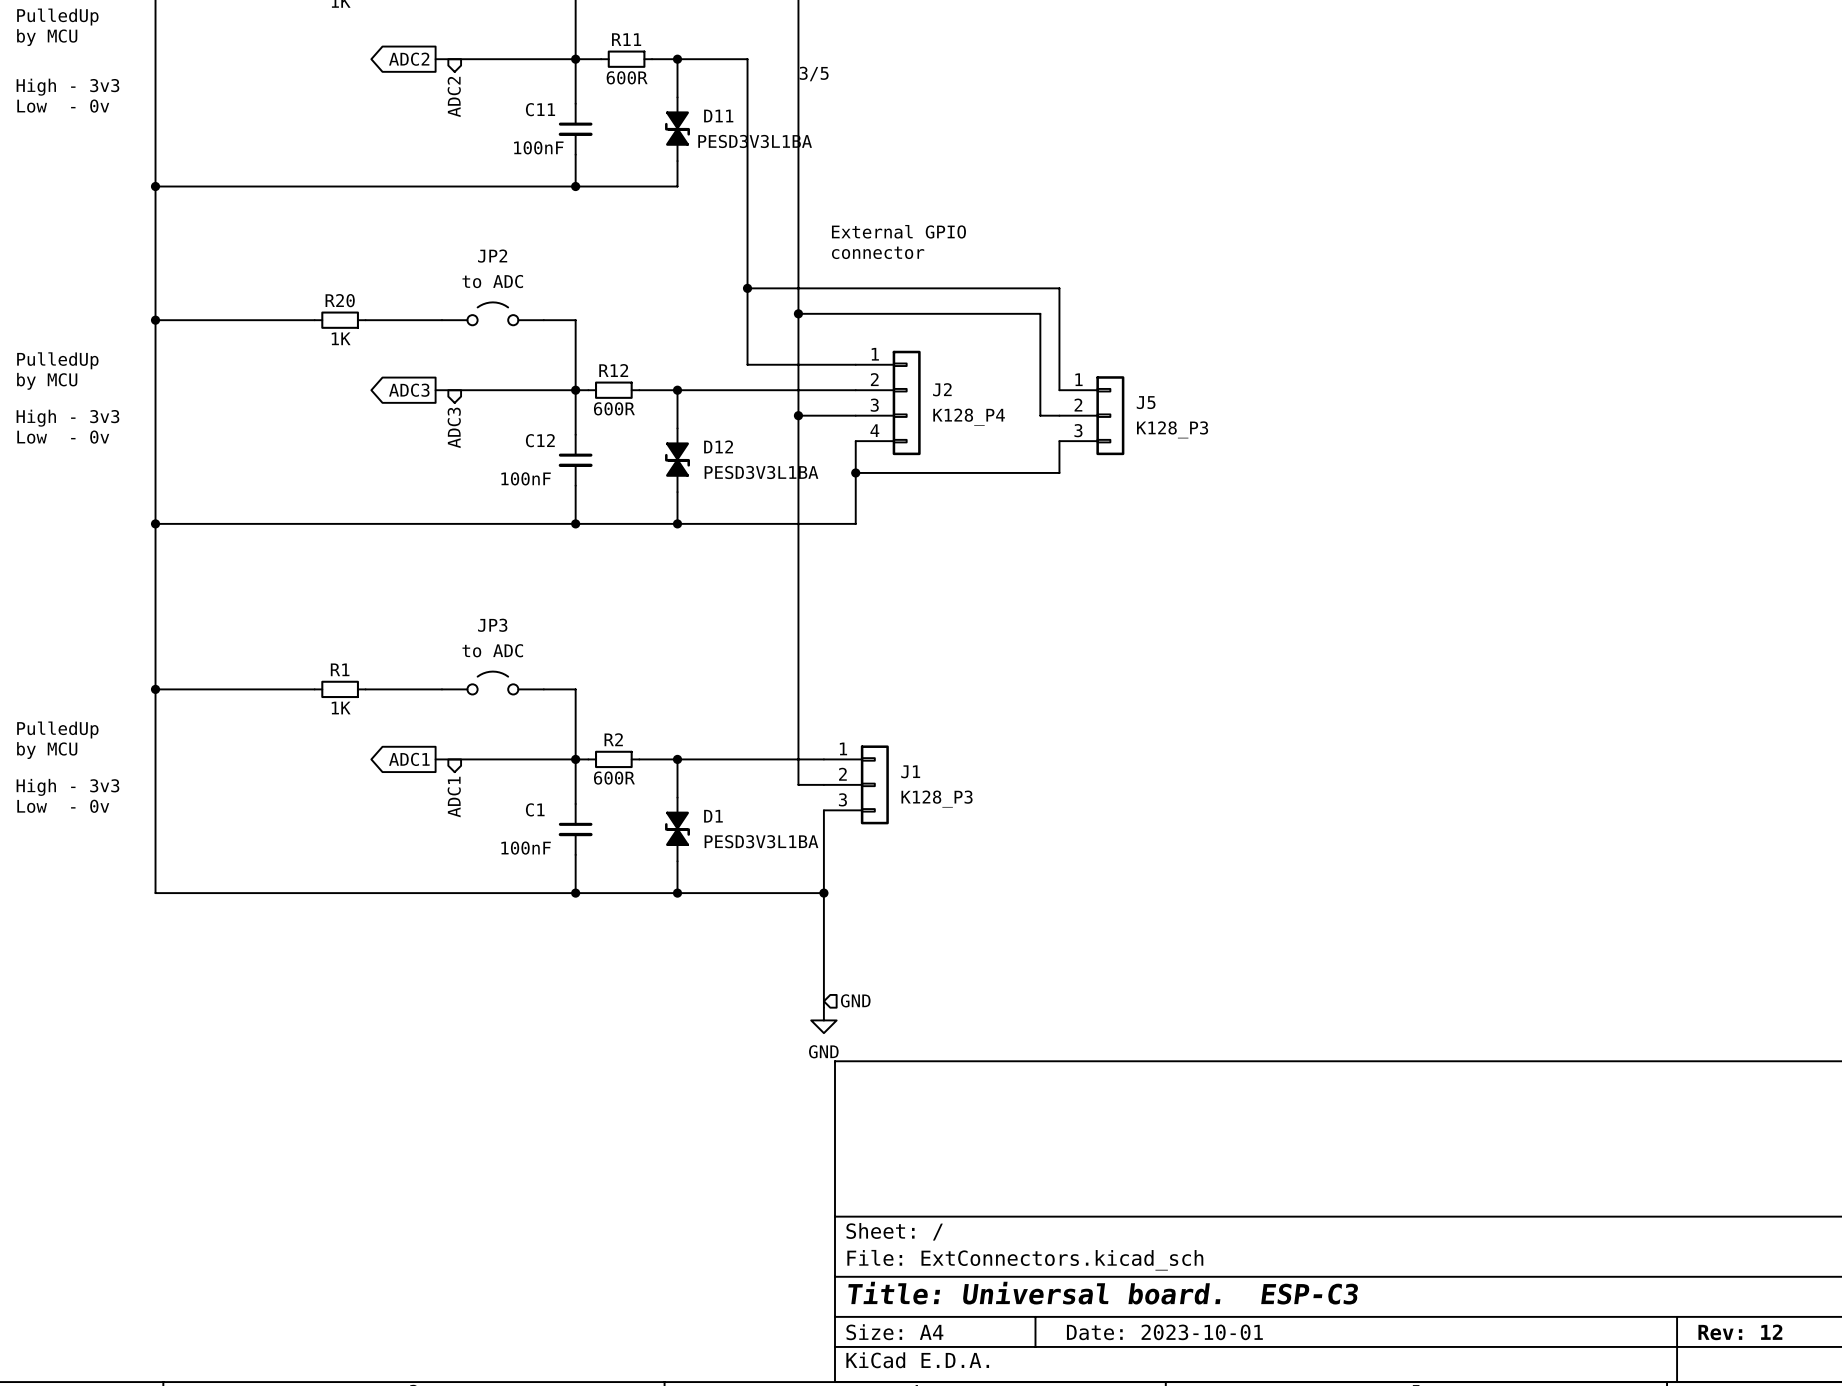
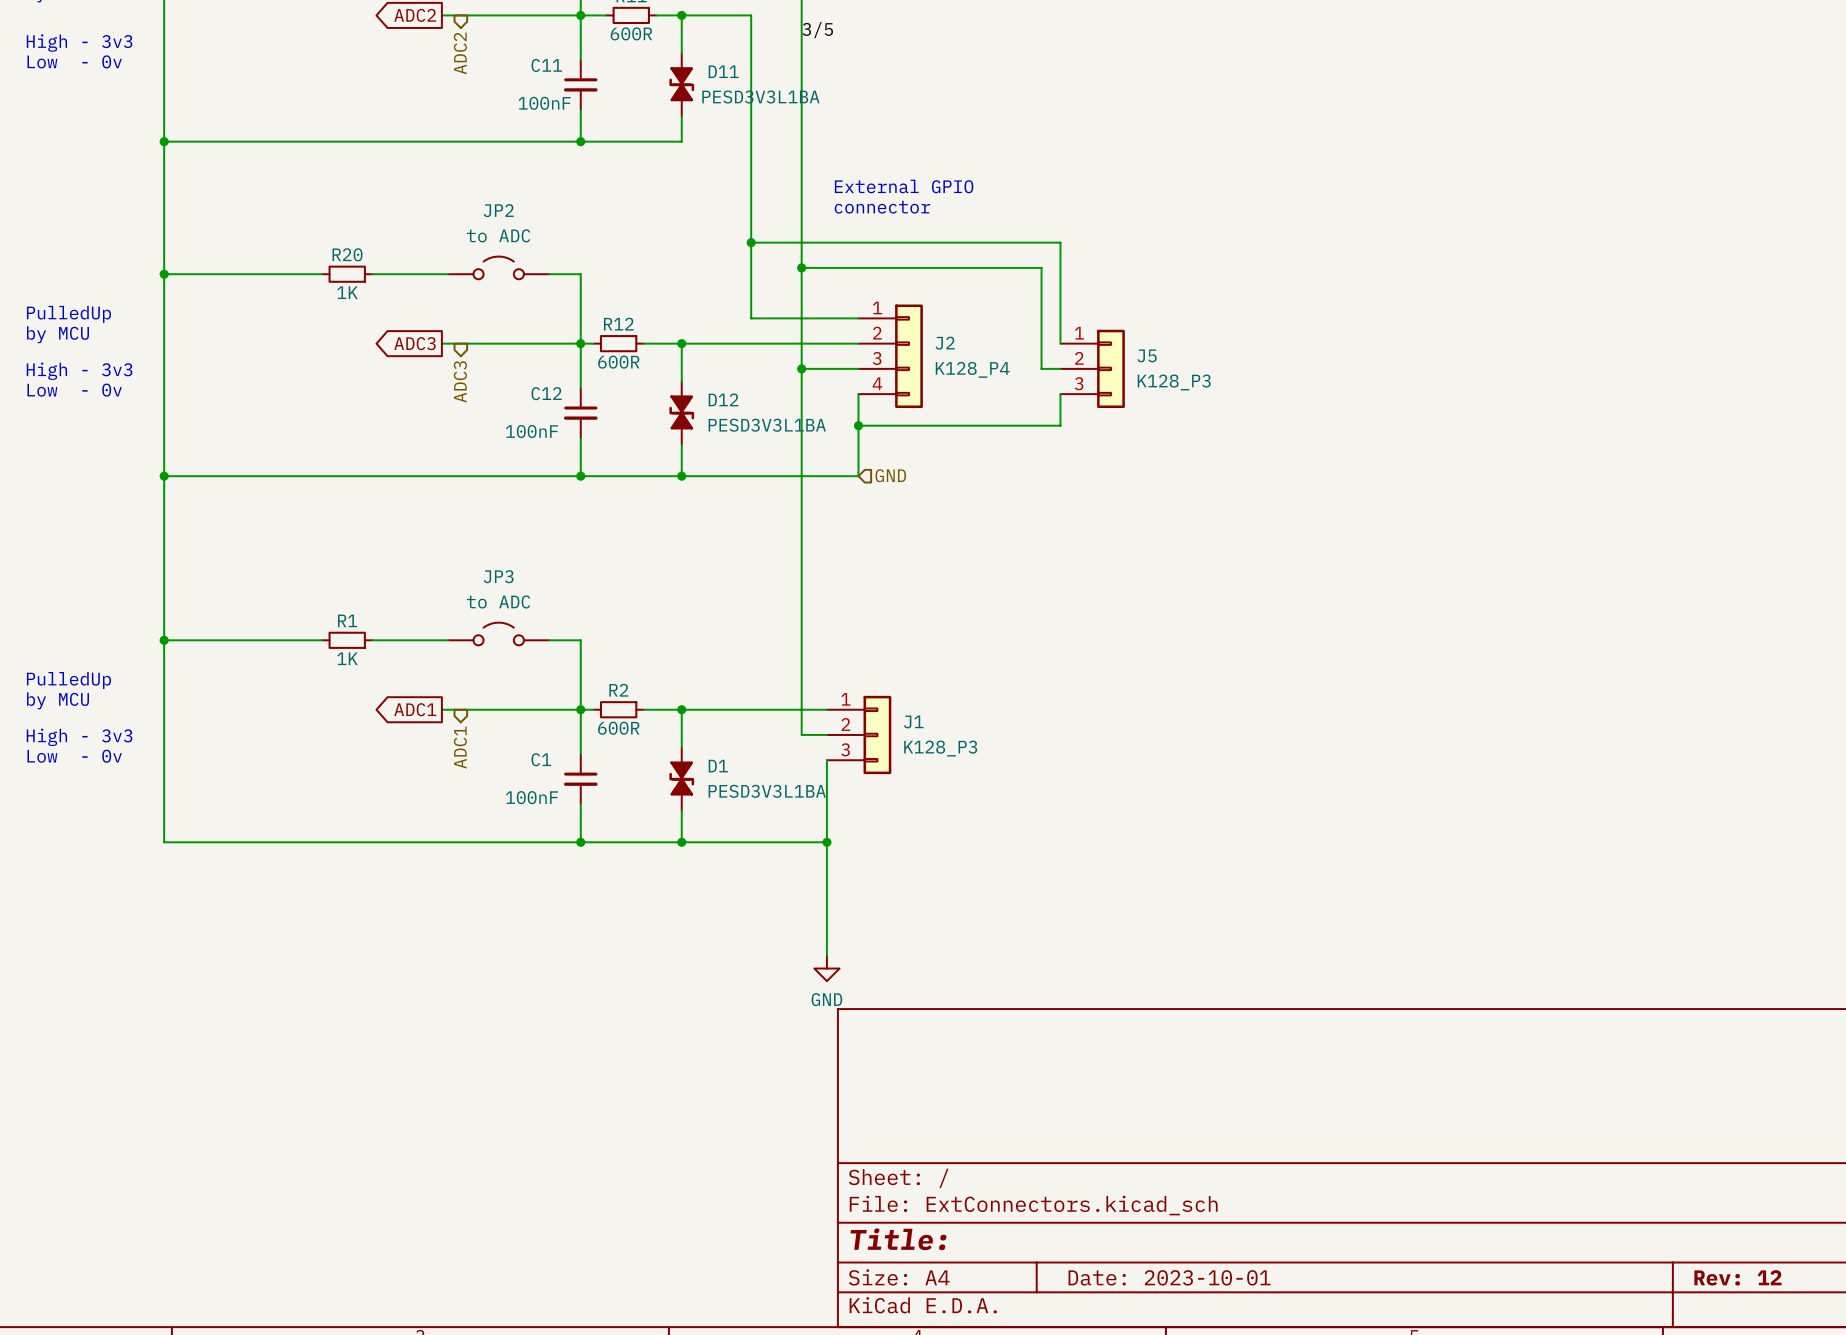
hierarchical label: none -> GND (890, 475)
hierarchical label: GND (855, 1000) -> none
title block: Title: Universal board. ESP-C3 (1103, 1293) -> Title: (898, 1239)

